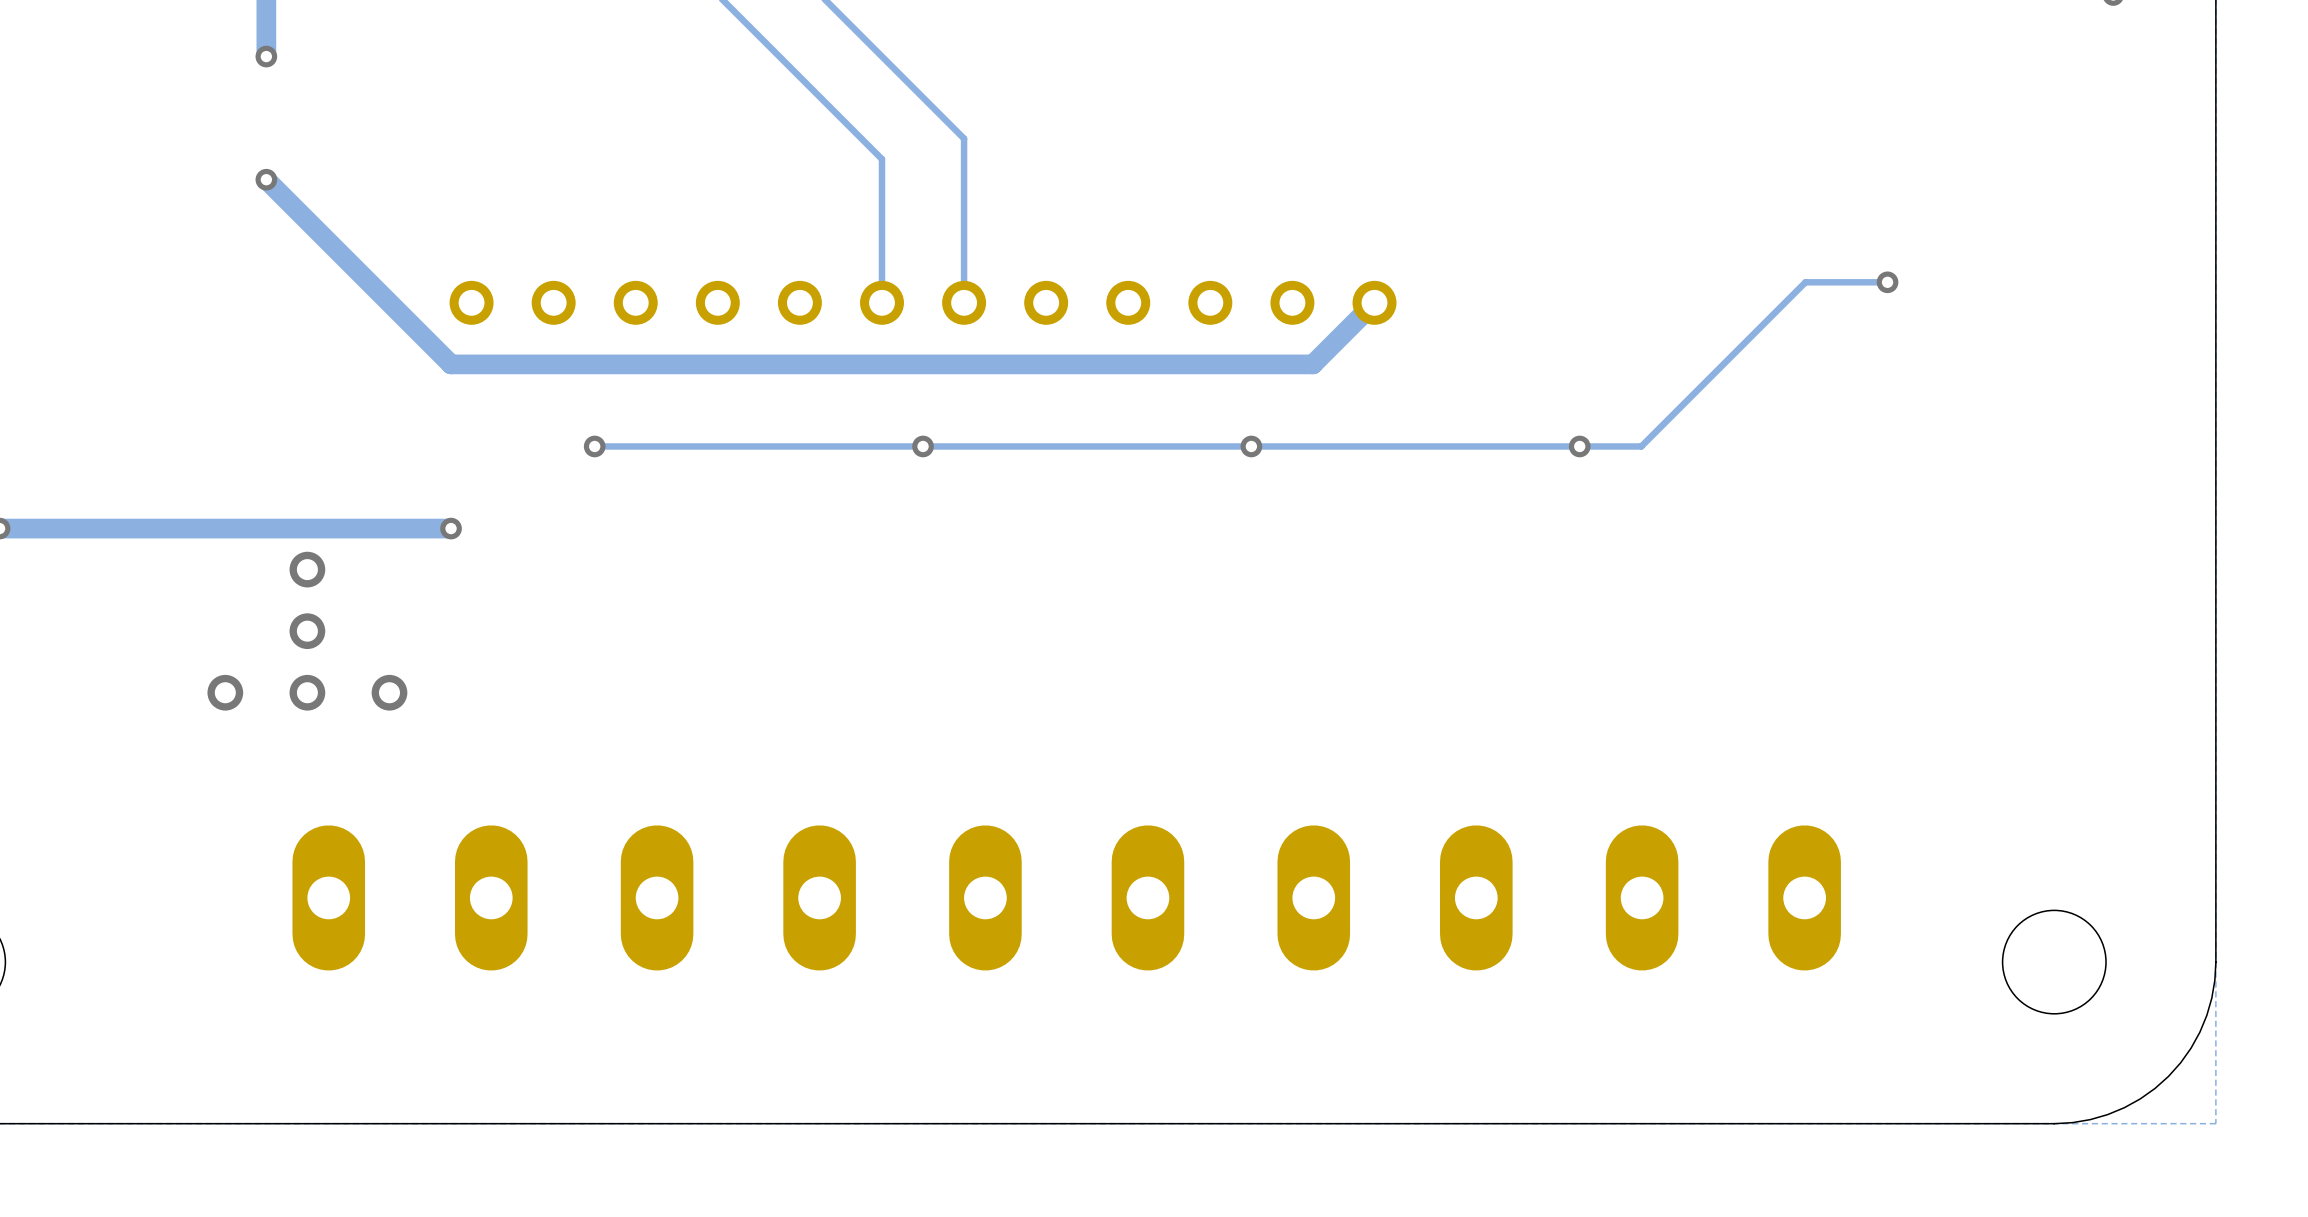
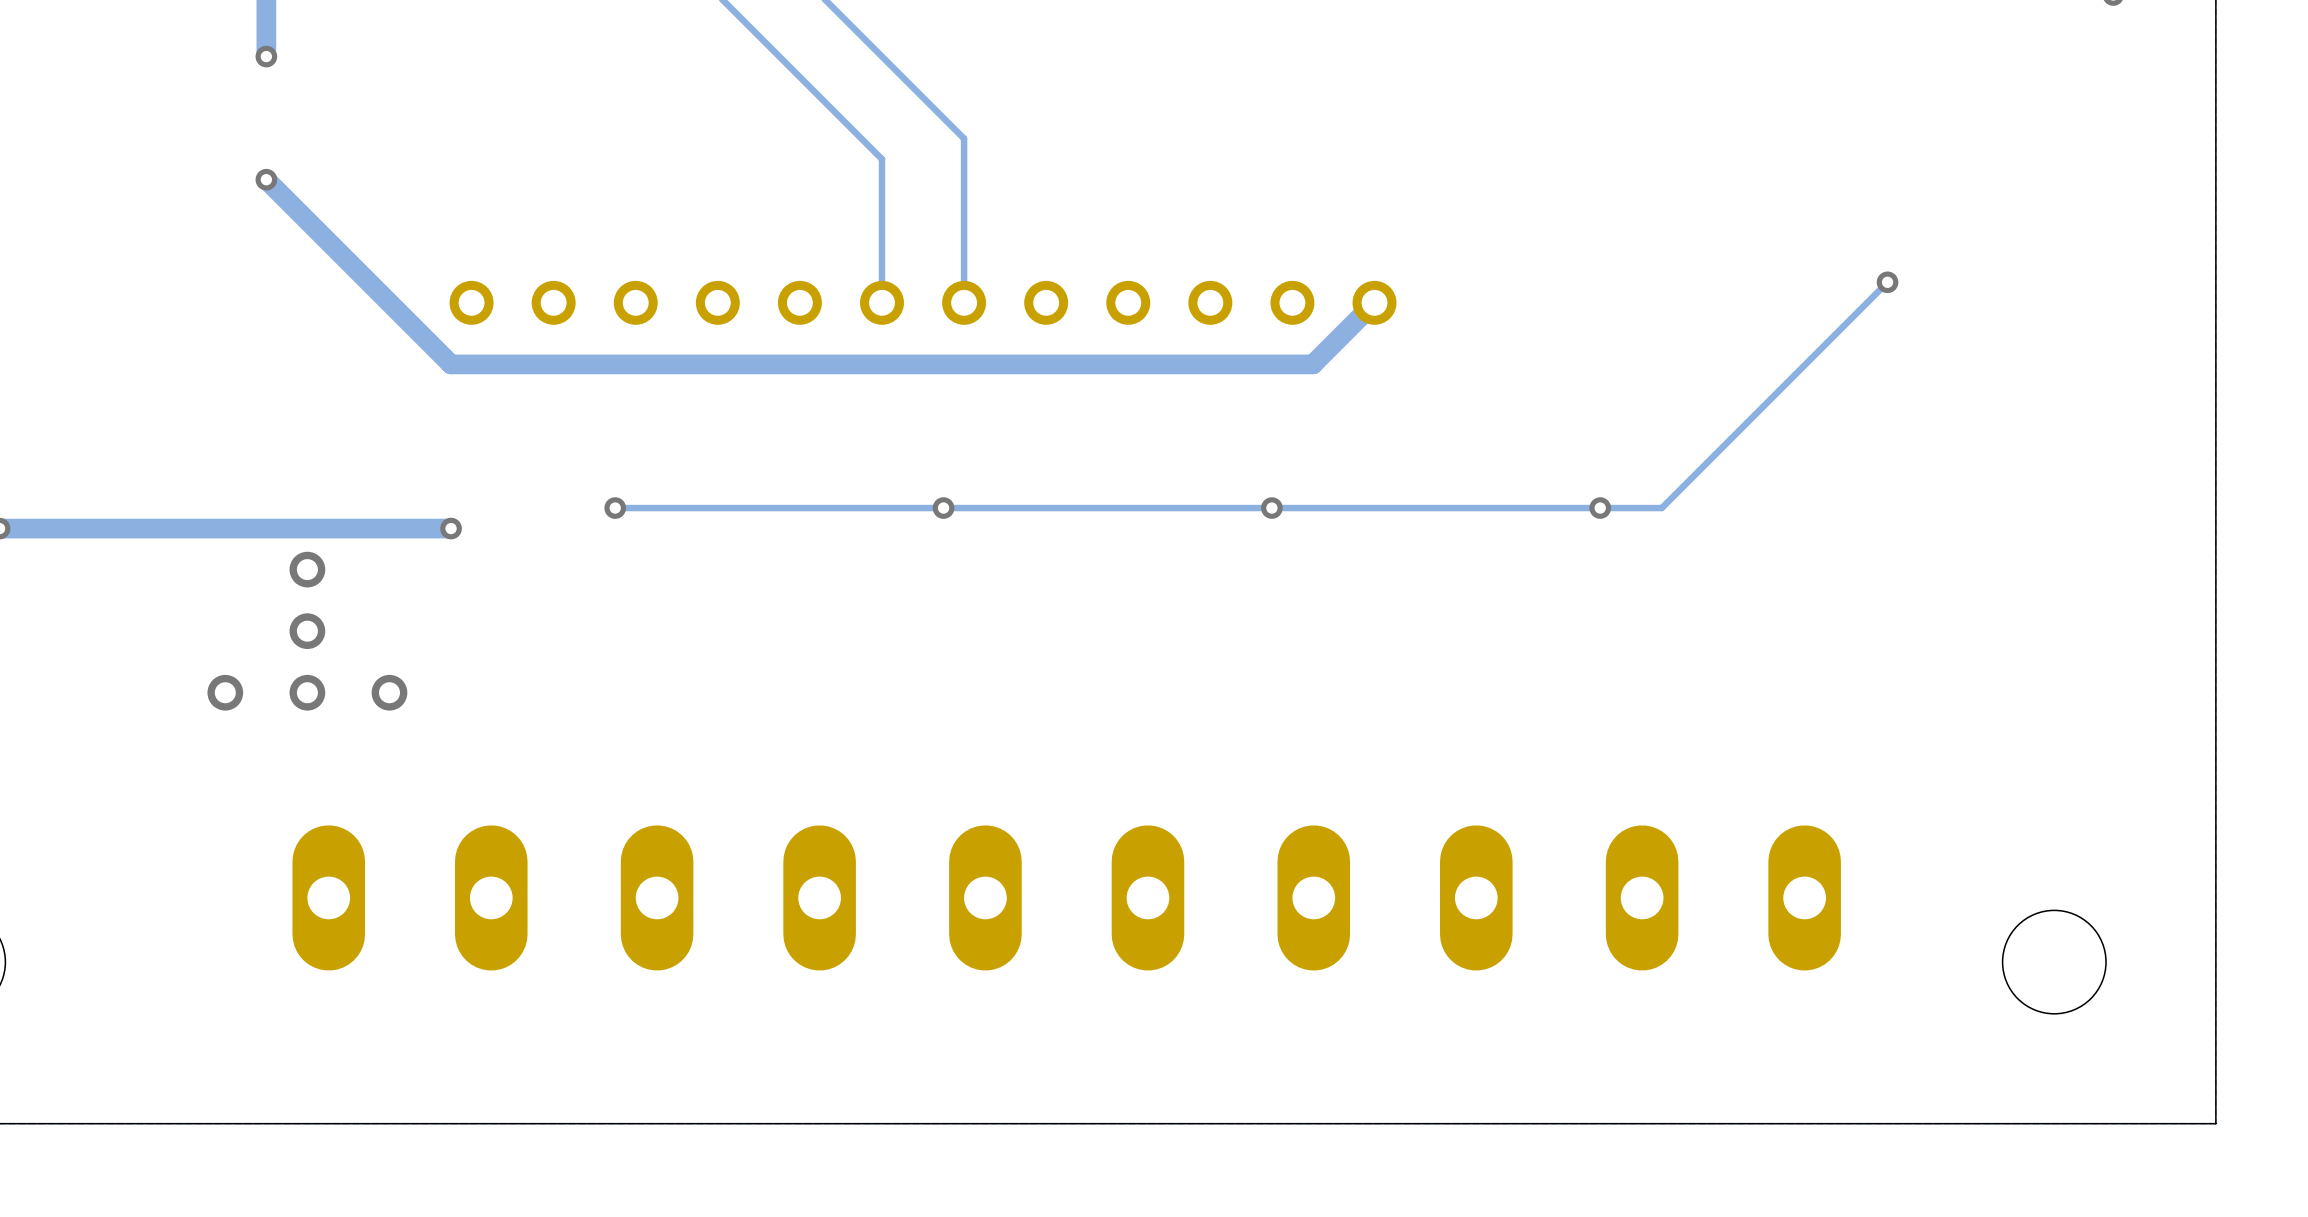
track: (1887, 282) (1805, 282) (1641, 446) (594, 446) -> (1887, 282) (1661, 508) (615, 508)
via position: (594, 446) -> (615, 508)
via position: (923, 446) -> (943, 508)
via position: (1251, 446) -> (1271, 508)
via position: (1579, 446) -> (1600, 508)
board edge: (2215, 962) (2214, 980) (2206, 1015) (2191, 1048) (2168, 1076) (2140, 1098) (2107, 1114) (2072, 1122) (2054, 1123) -> (2215, 962) (2215, 1123) (2054, 1123)

